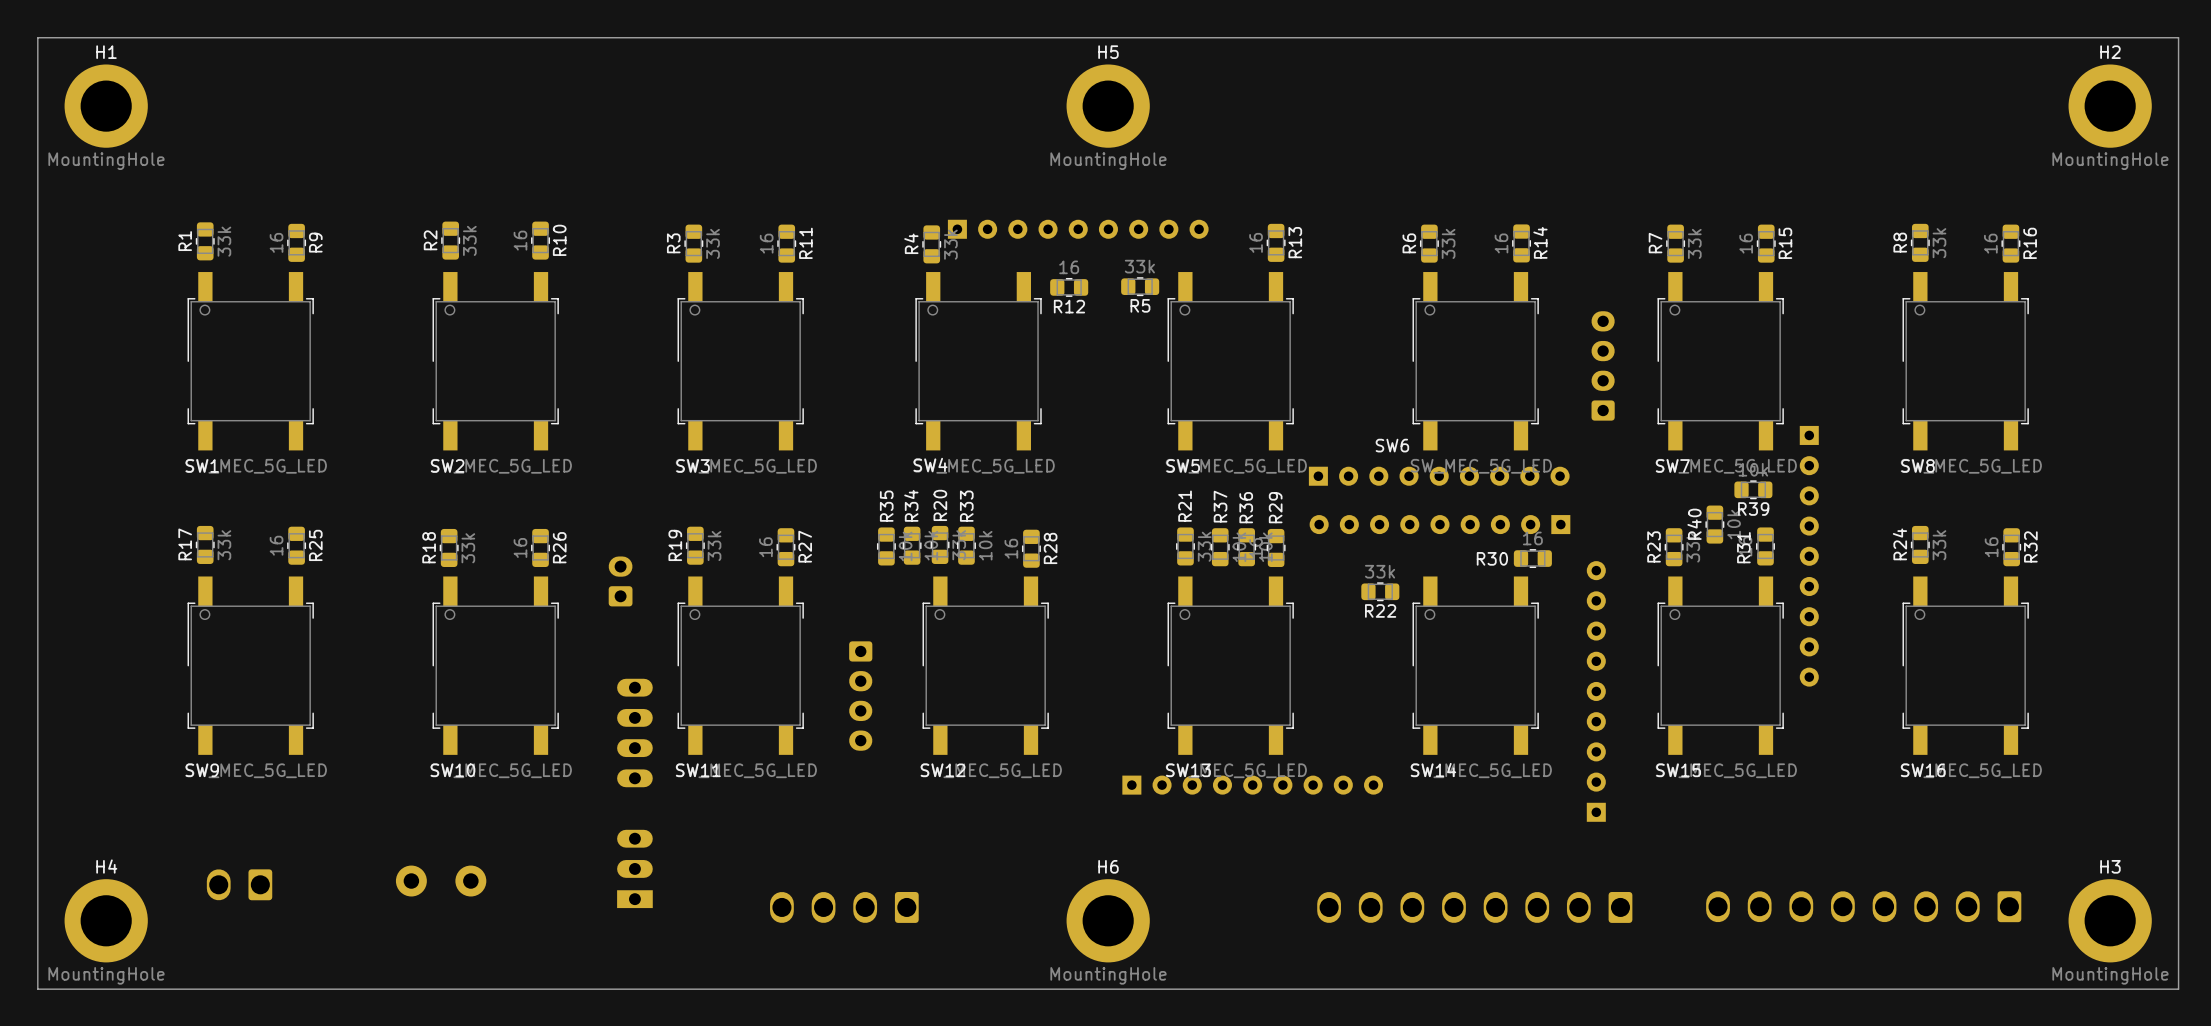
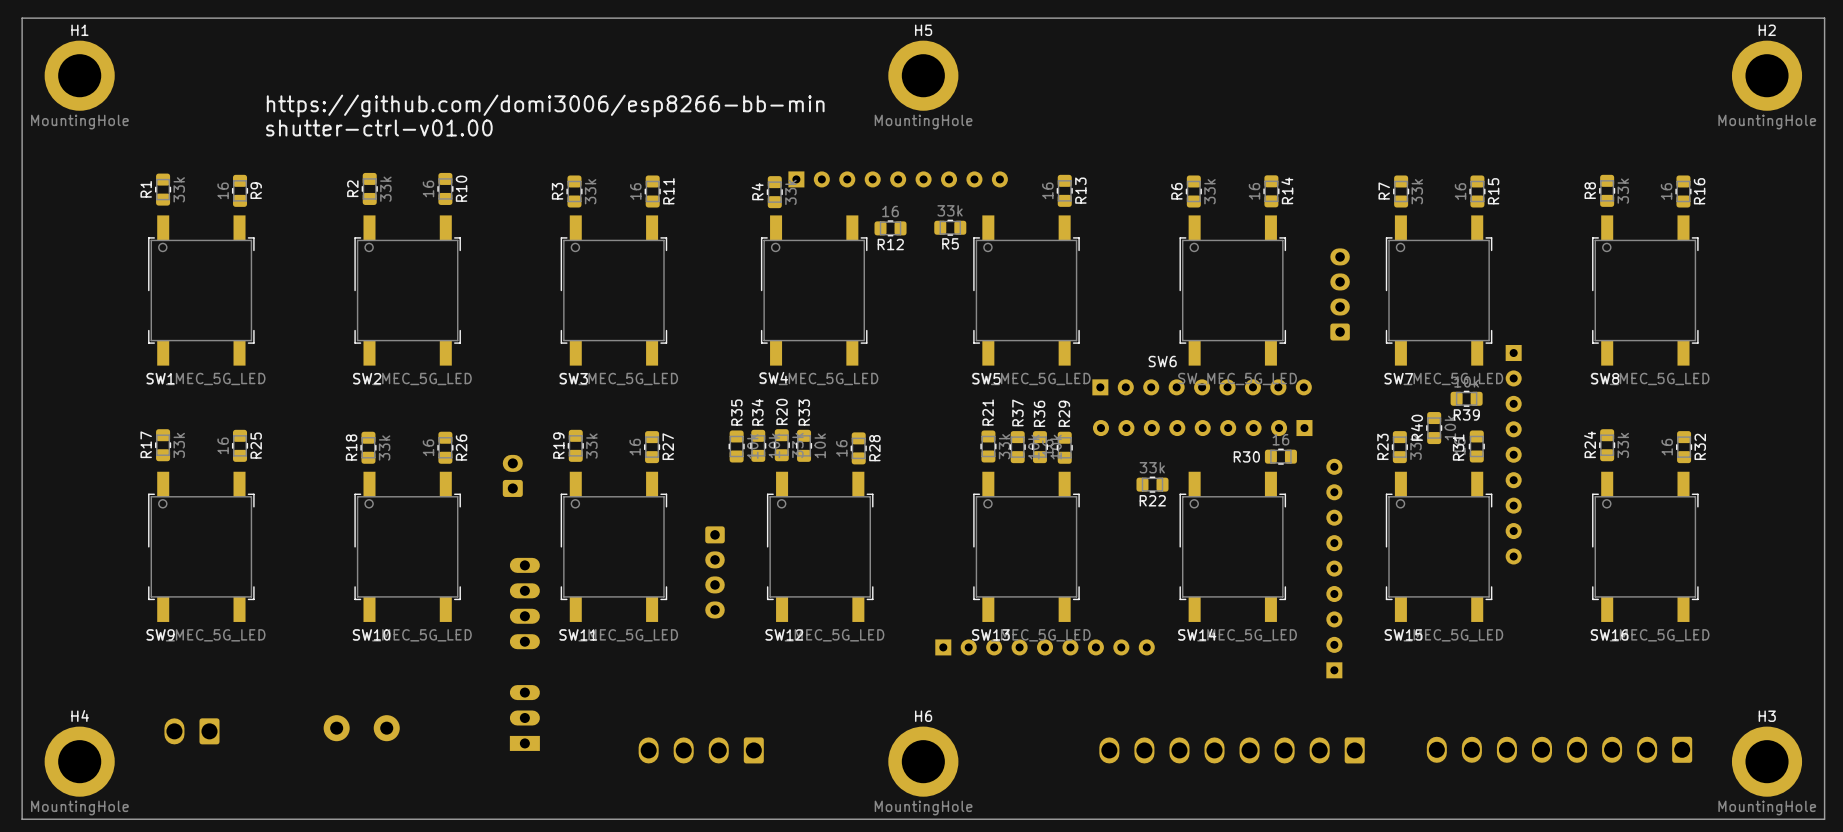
text: none -> https://github.com/domi3006/esp8266-bb-min (545, 105)
text: none -> shutter-ctrl-v01.00 (379, 127)

